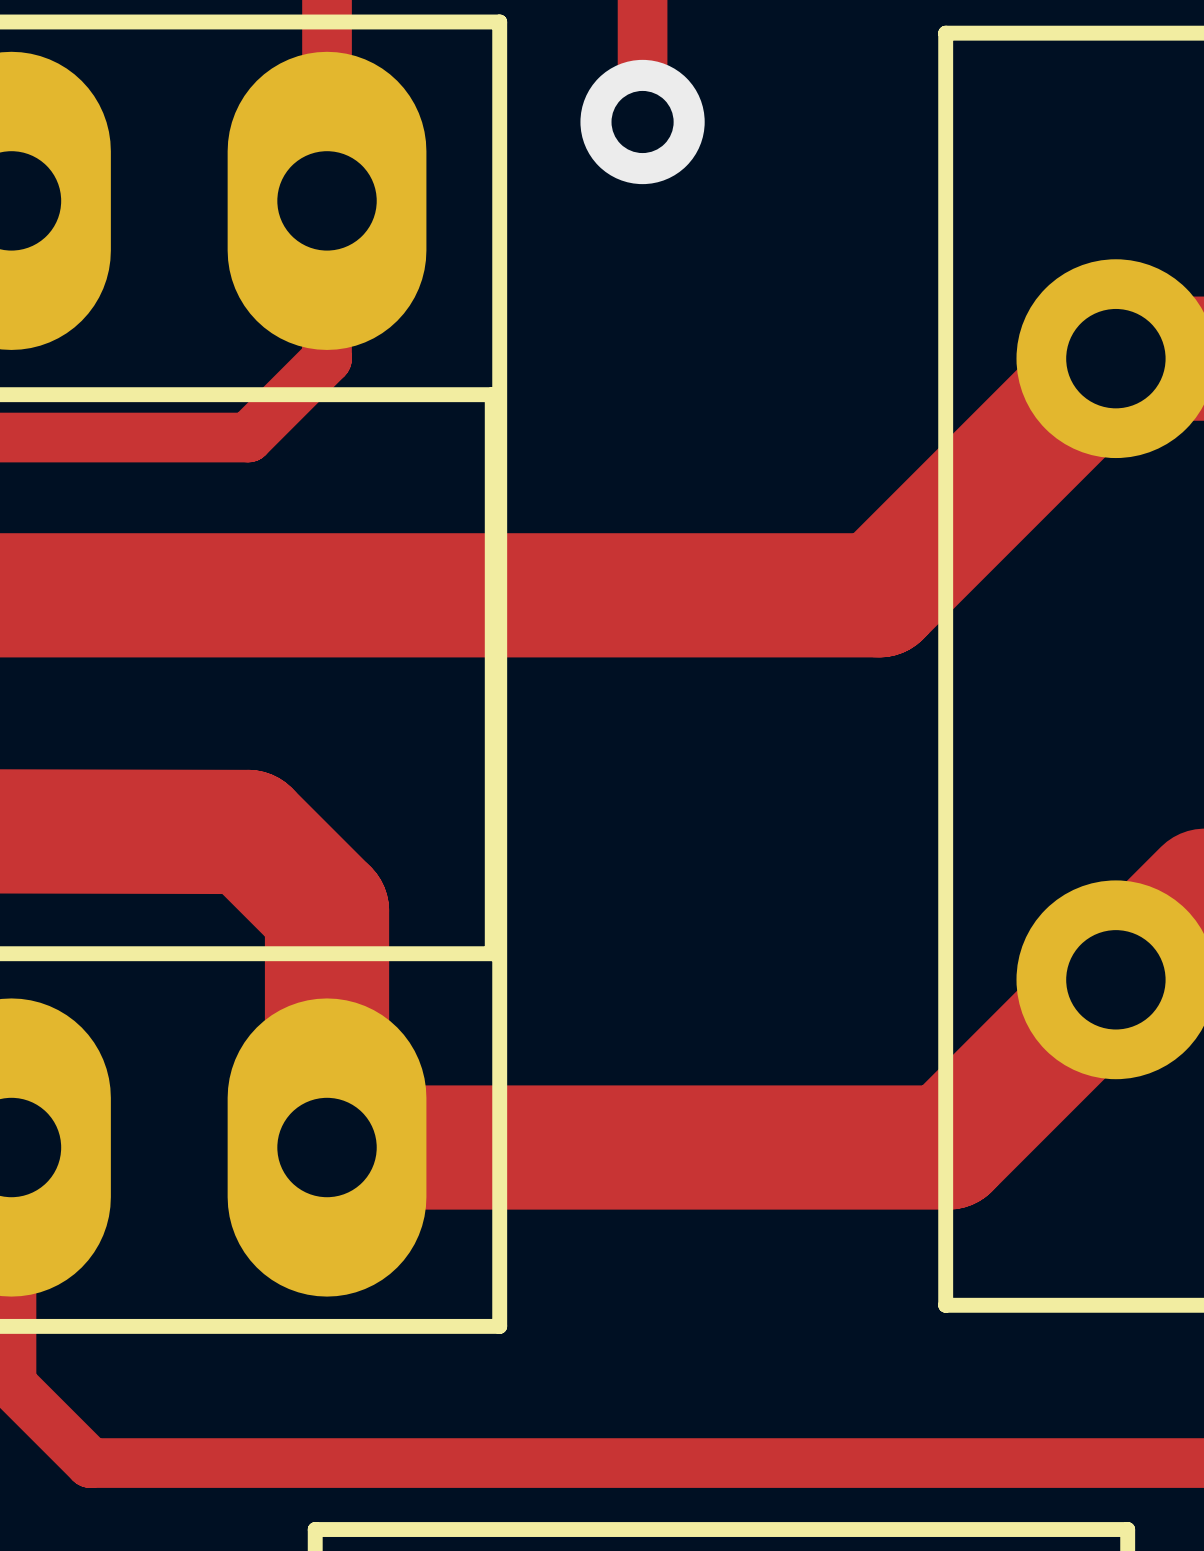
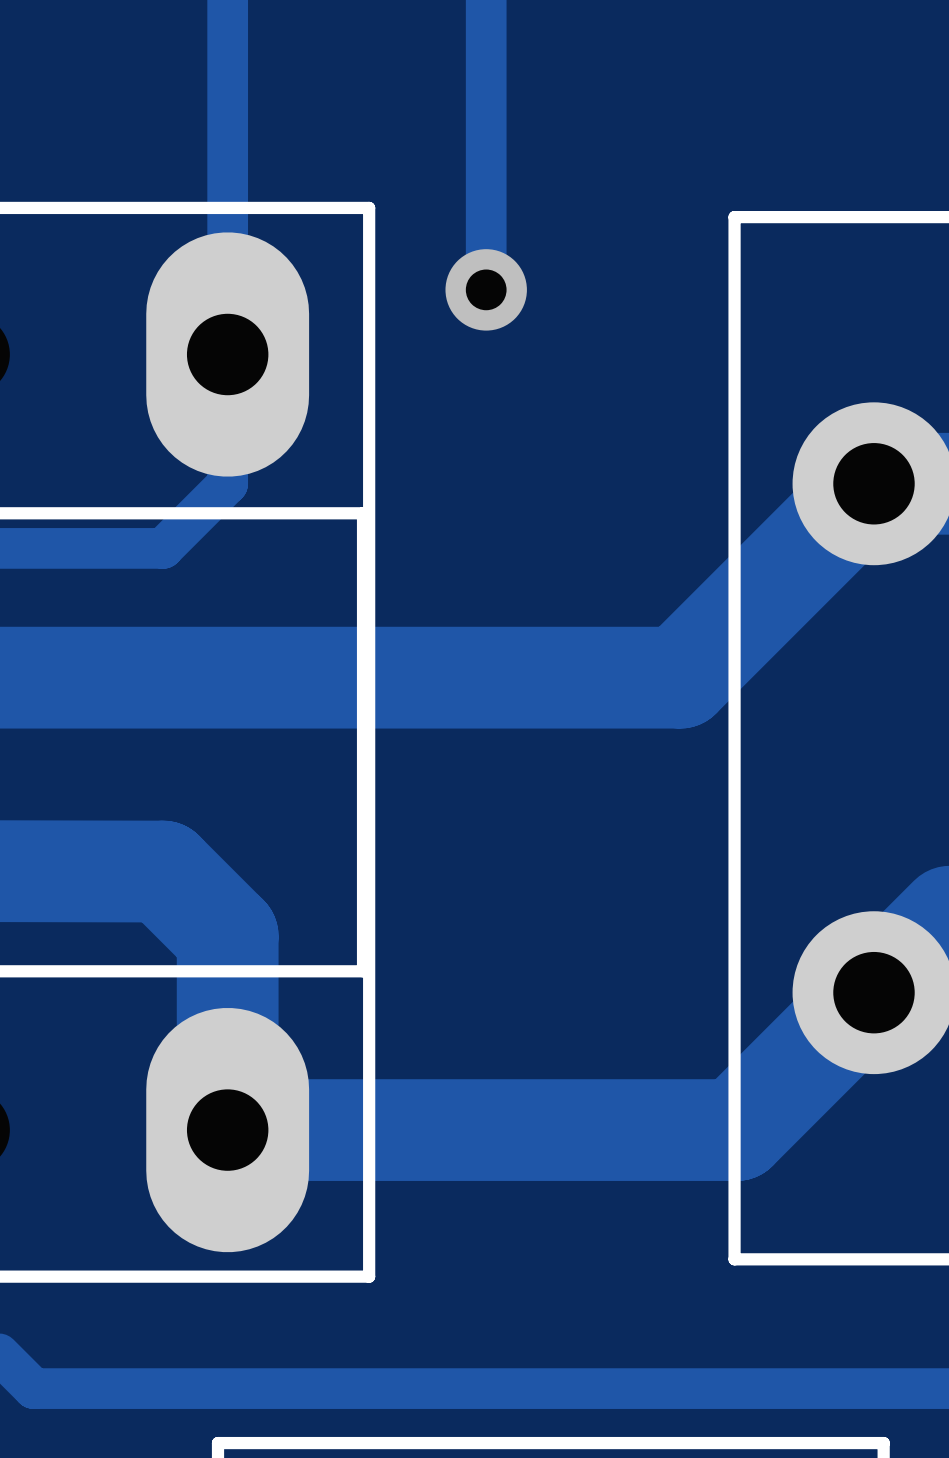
via size: [580, 59, 705, 185] -> [445, 249, 527, 331]

